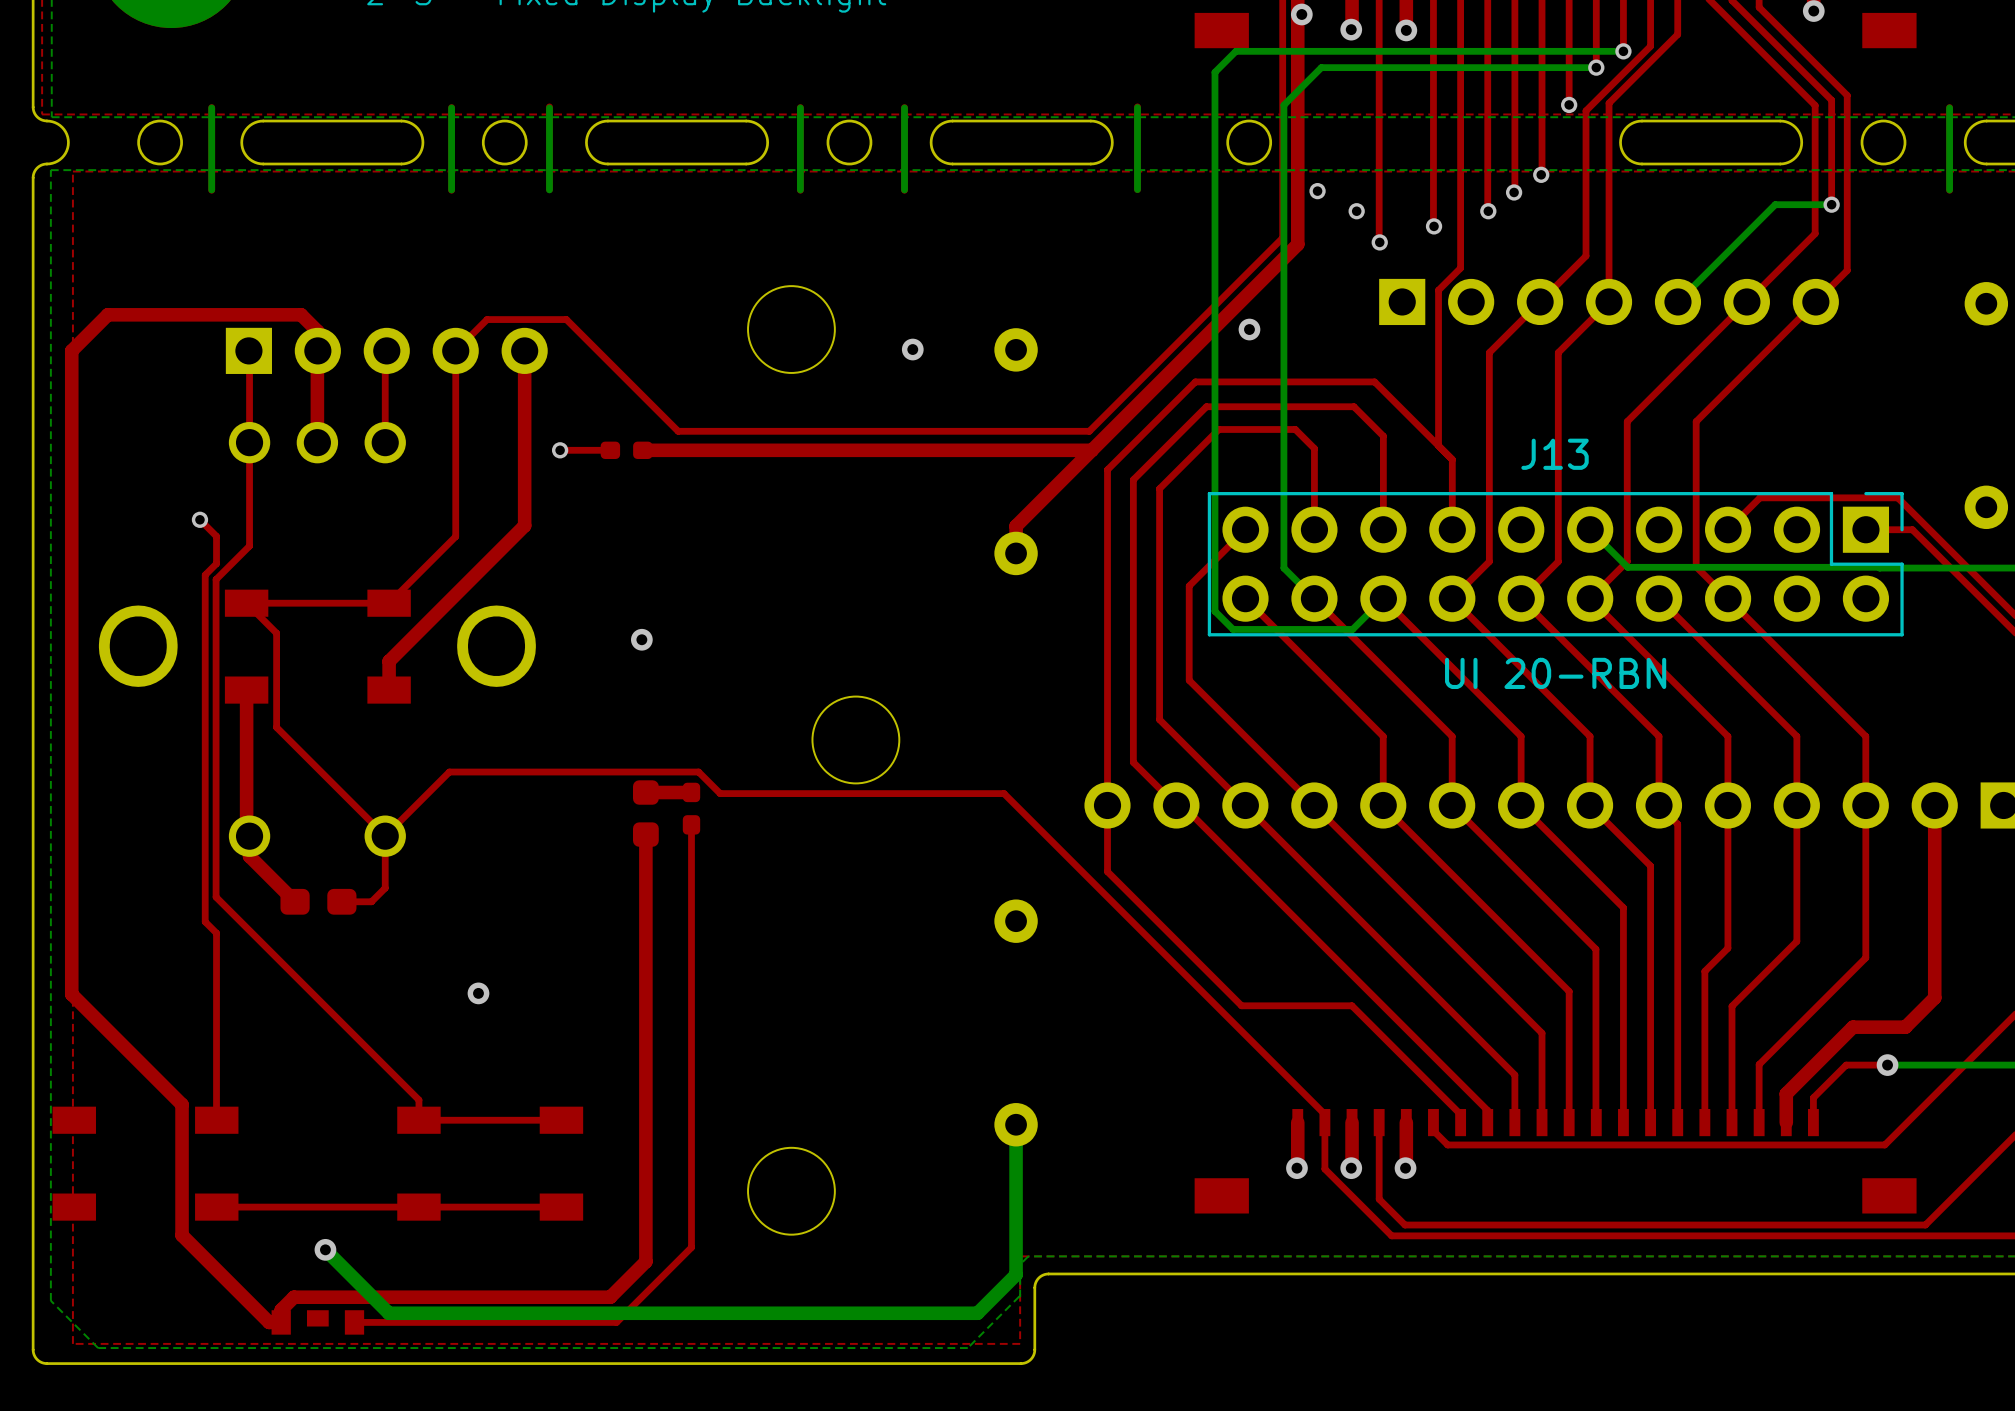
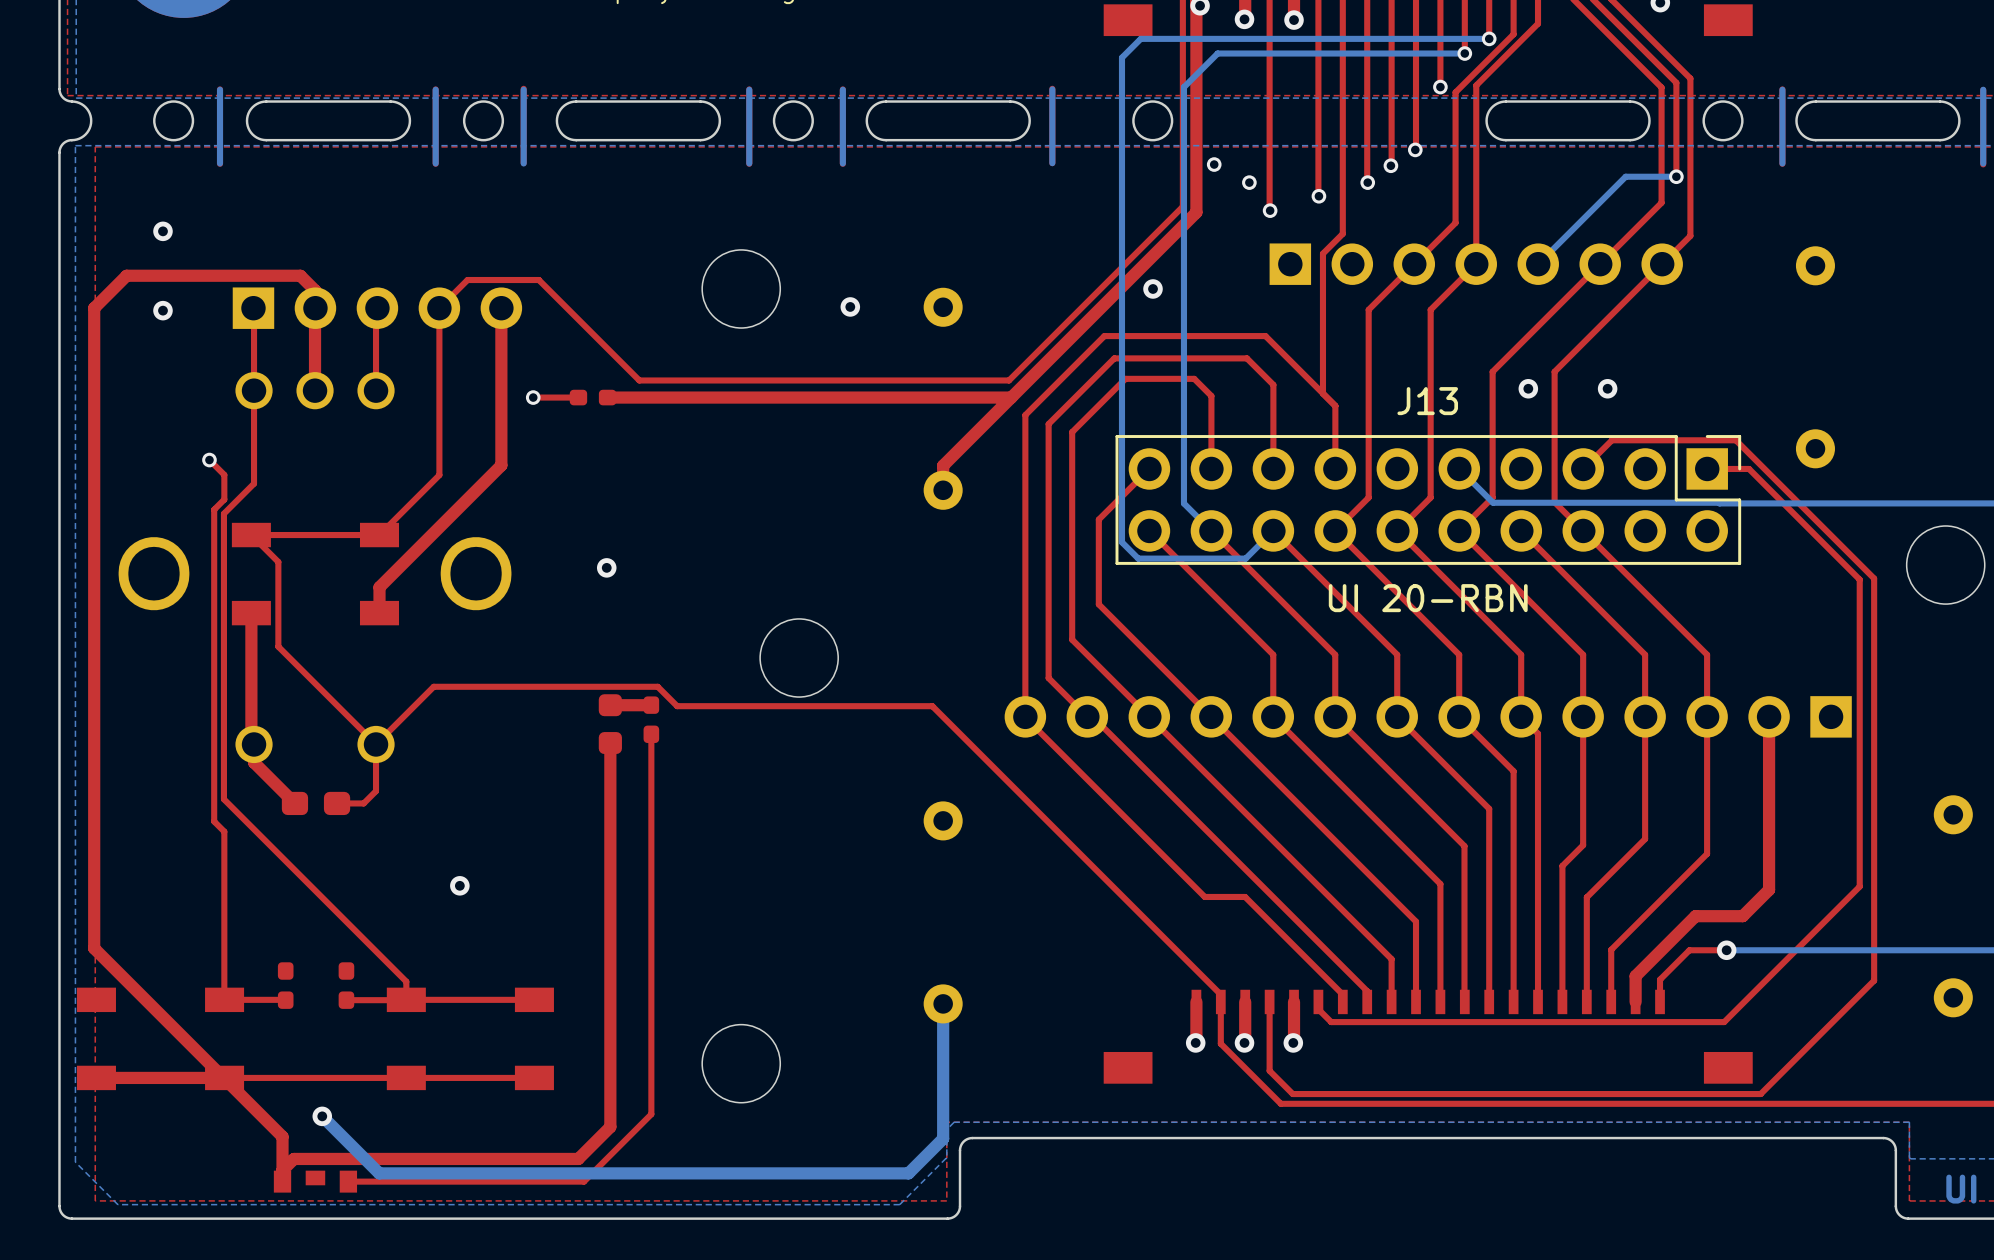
via: none -> (162, 231)
via: none -> (162, 310)
via: none -> (1528, 388)
via: none -> (1607, 388)
top track: (1107, 805) (1107, 871) (1241, 1005) (1307, 1005) -> (1025, 717) (1204, 896)
top track: (71, 994) (182, 1104) (182, 1235) (269, 1322) (281, 1322) -> (94, 886) (94, 948) (282, 1136) (282, 1170)
part: none -> (285, 985)
part: none -> (346, 985)
top track: none -> (287, 999) (224, 999)
top track: none -> (406, 1000) (348, 1000)
top track: none -> (224, 1077) (96, 1077)

